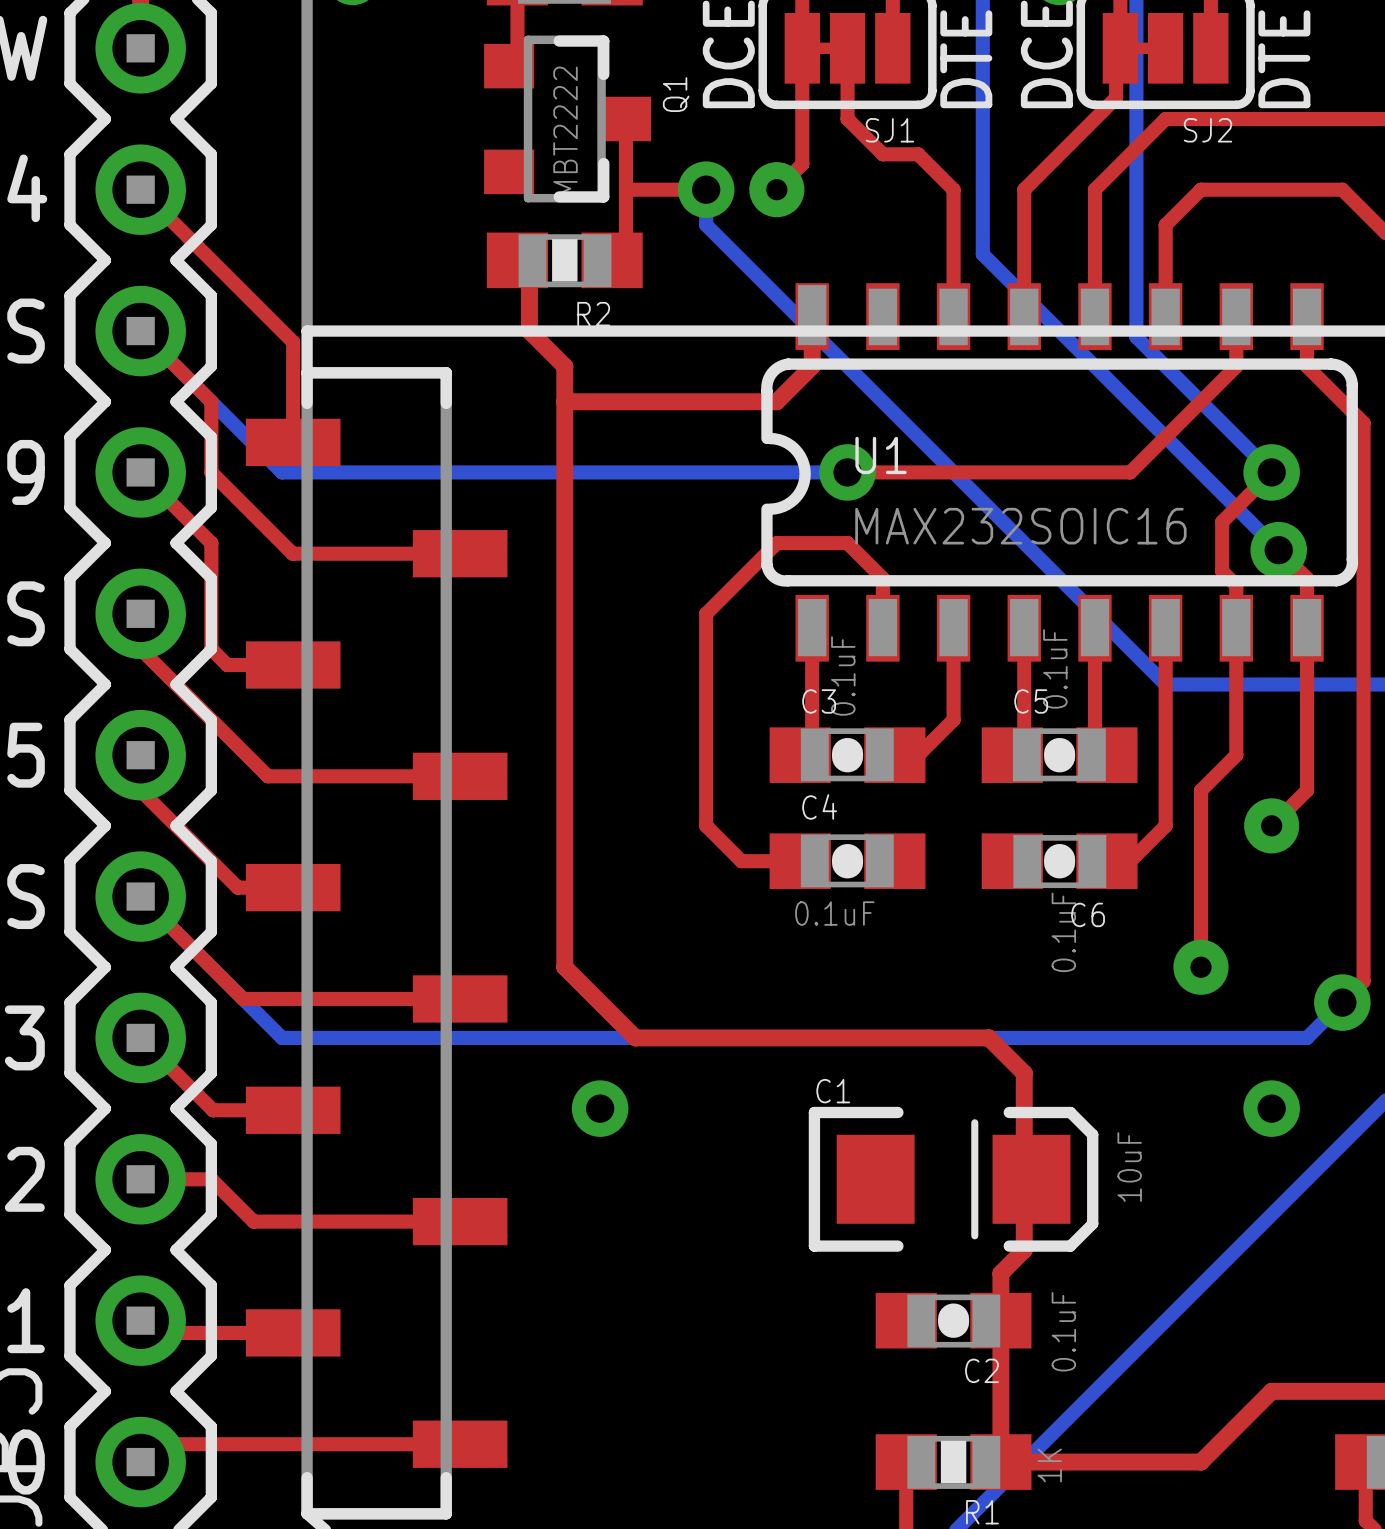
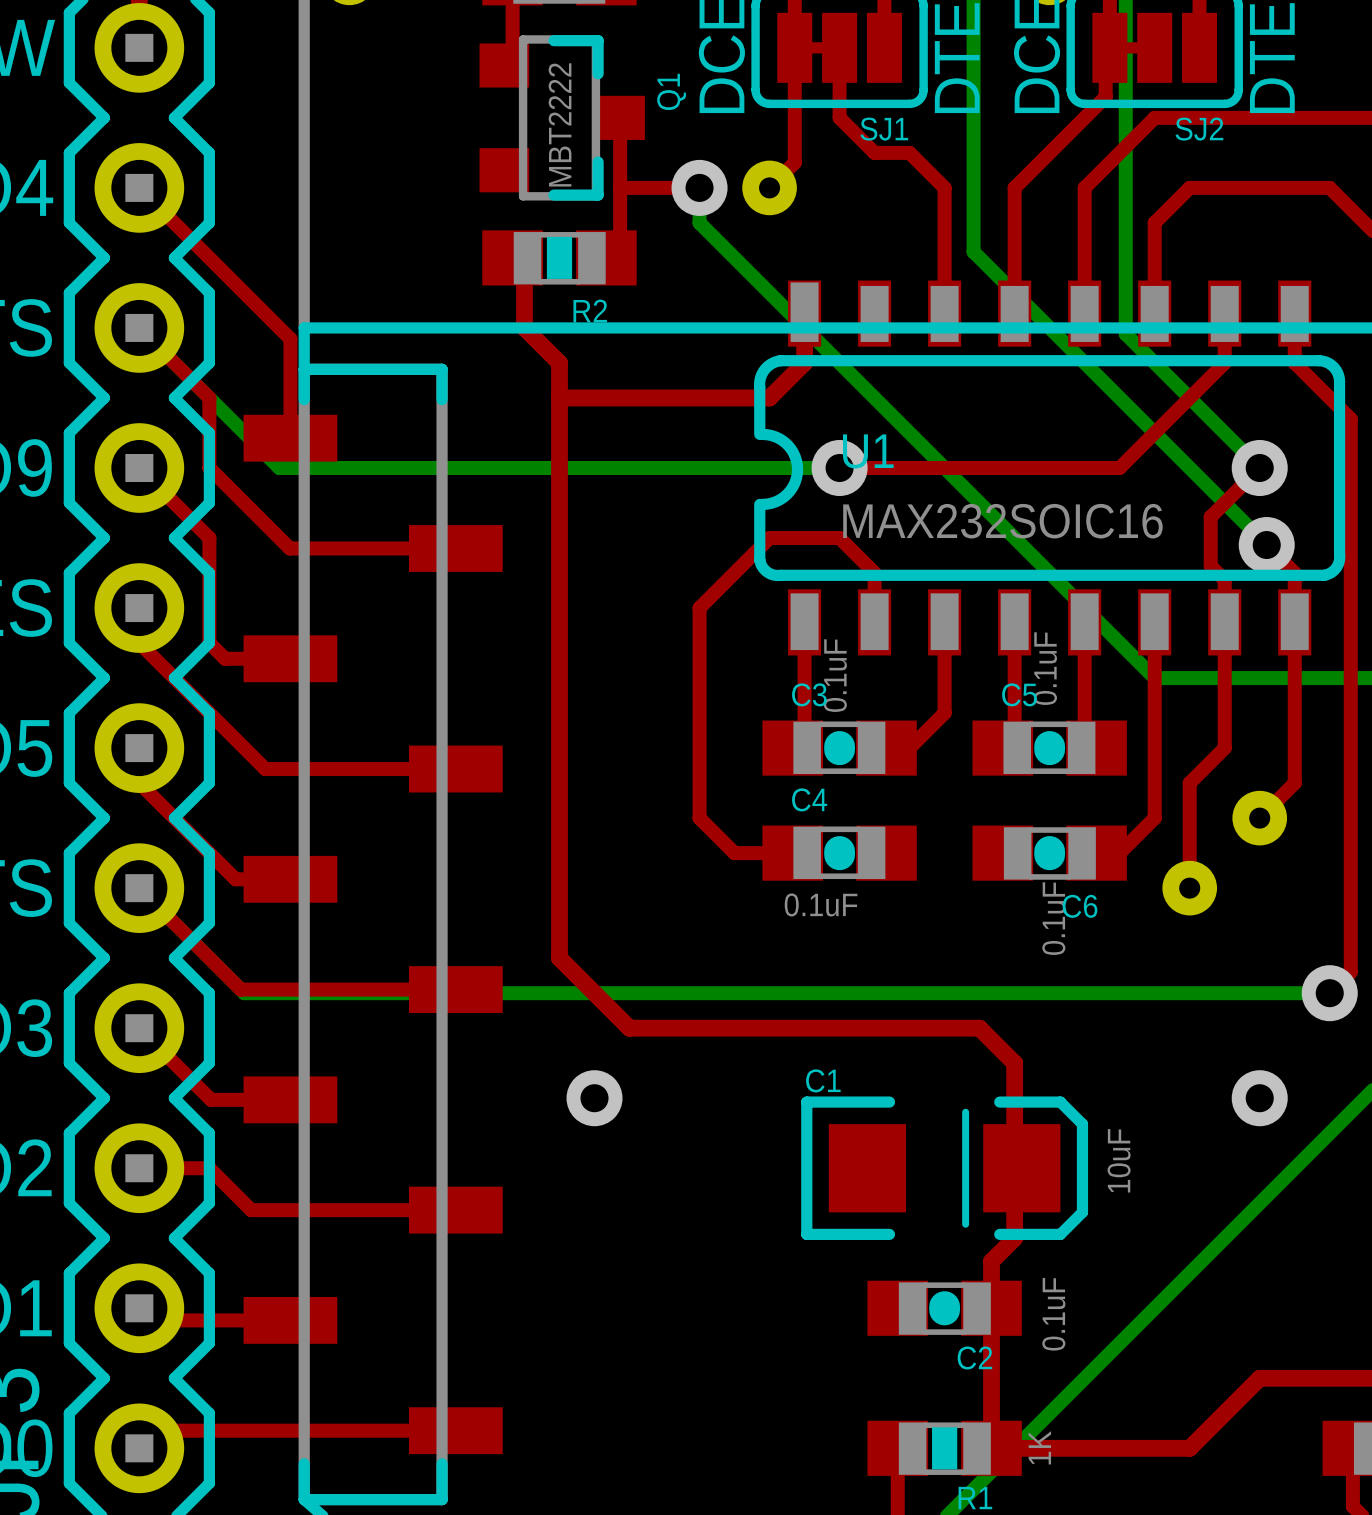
top track: (1200, 896) (1200, 967) -> none
part position: (1200, 967) -> (1189, 888)
bottom track: (246, 1002) (282, 1037) (1307, 1037) (1342, 1002) -> (244, 993) (1329, 993)

